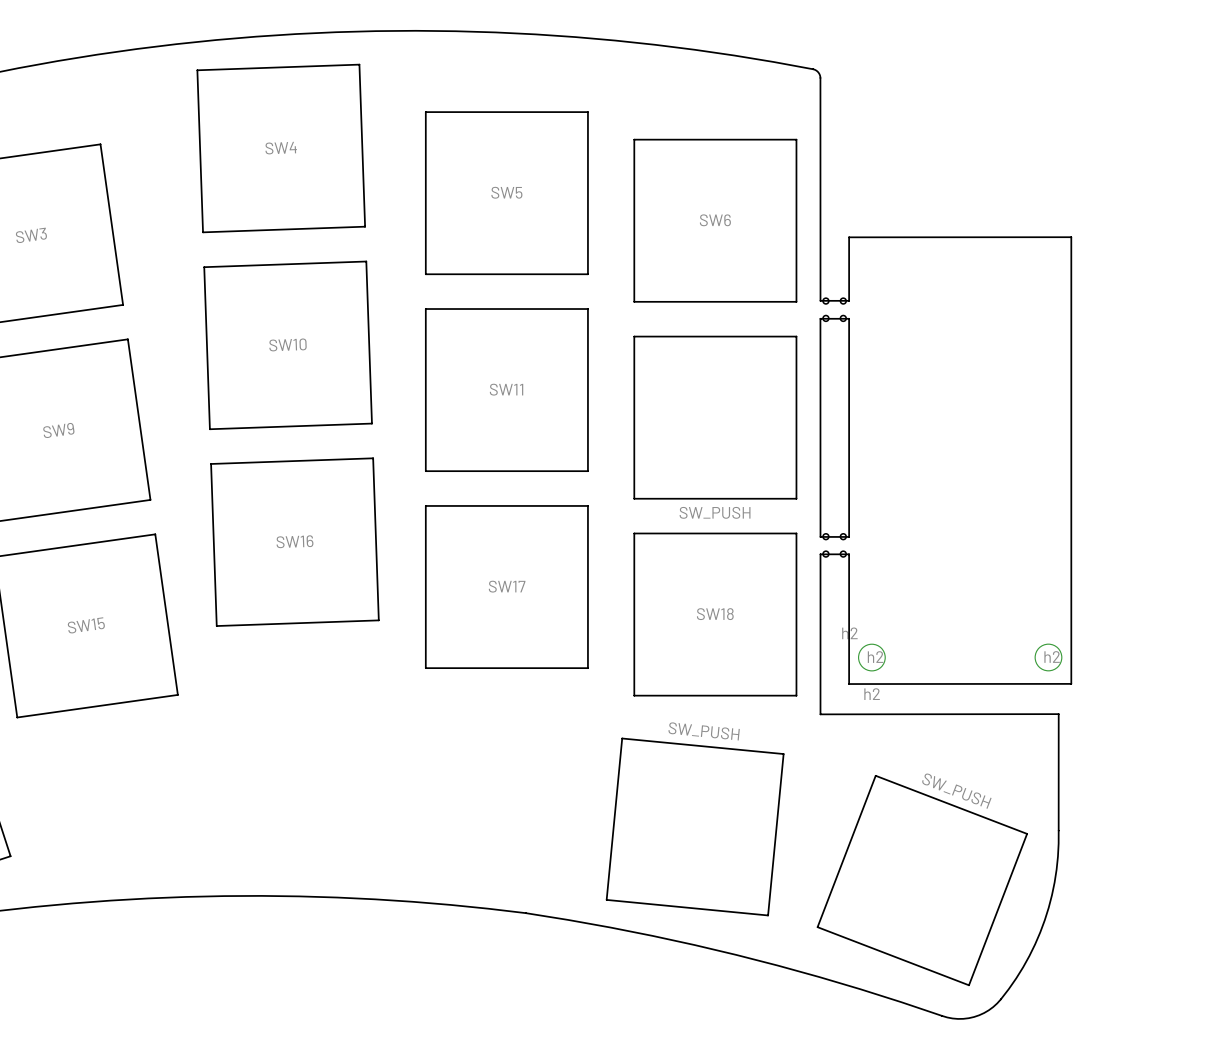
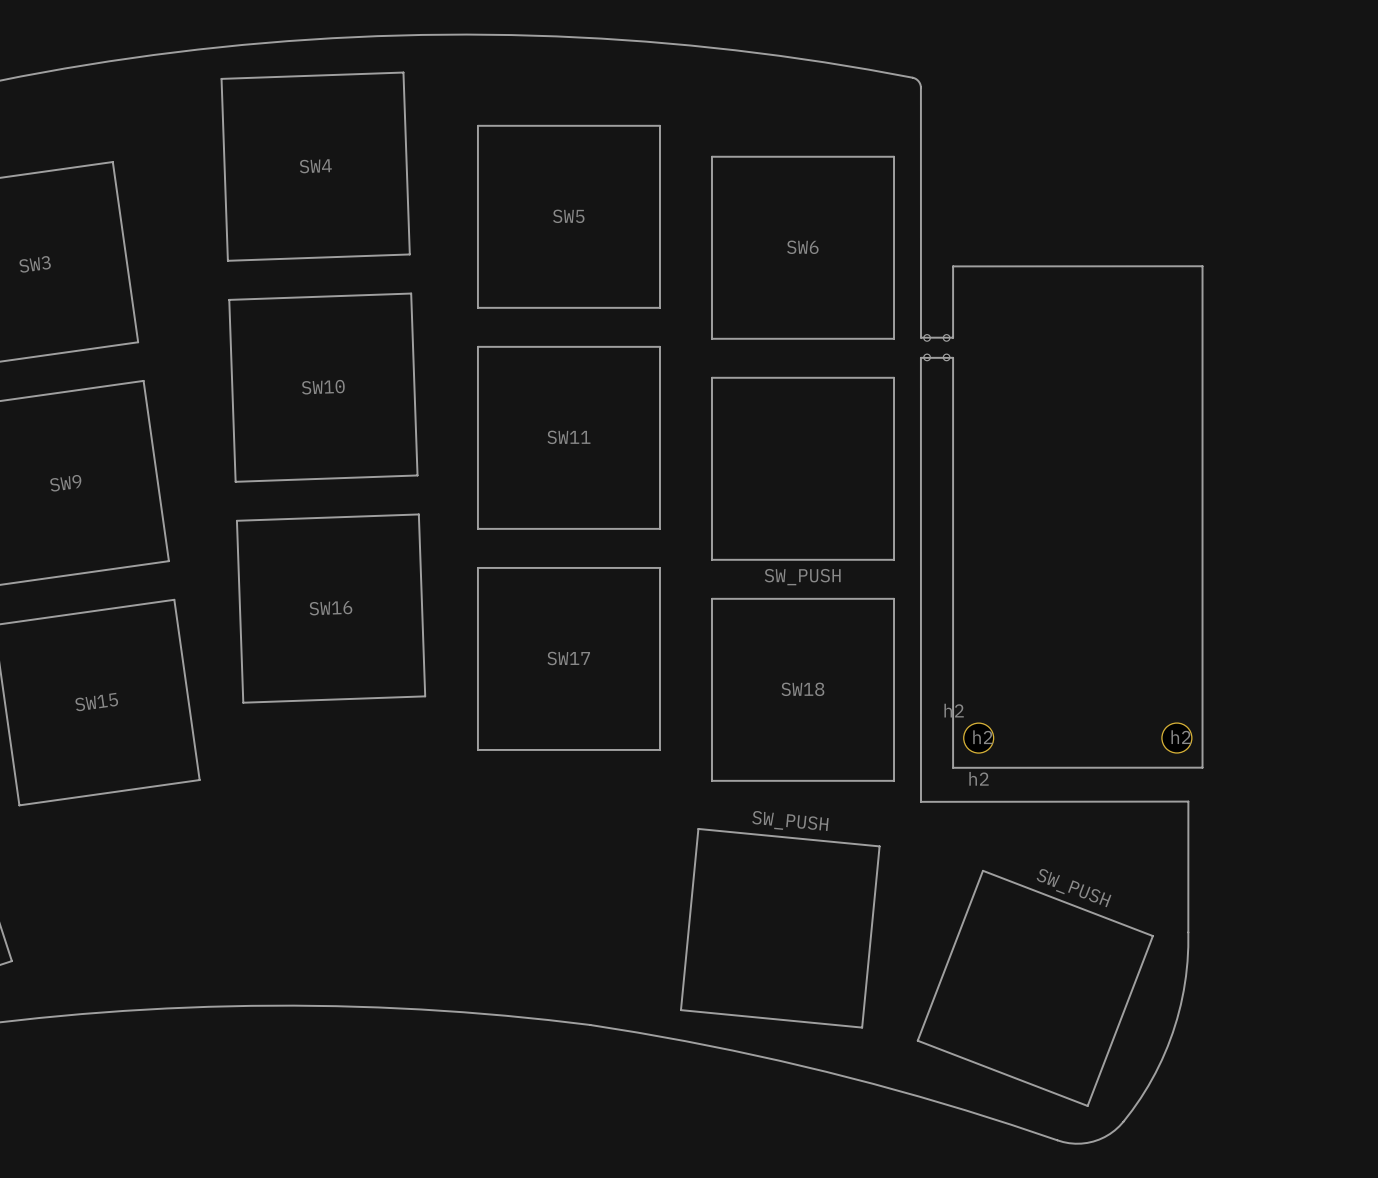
board edge: (820, 318) (820, 536) (849, 536) -> (920, 357) (920, 801)
part: (834, 545) -> none
board edge: (849, 554) (820, 554) (820, 714) -> (953, 622) (953, 602)

